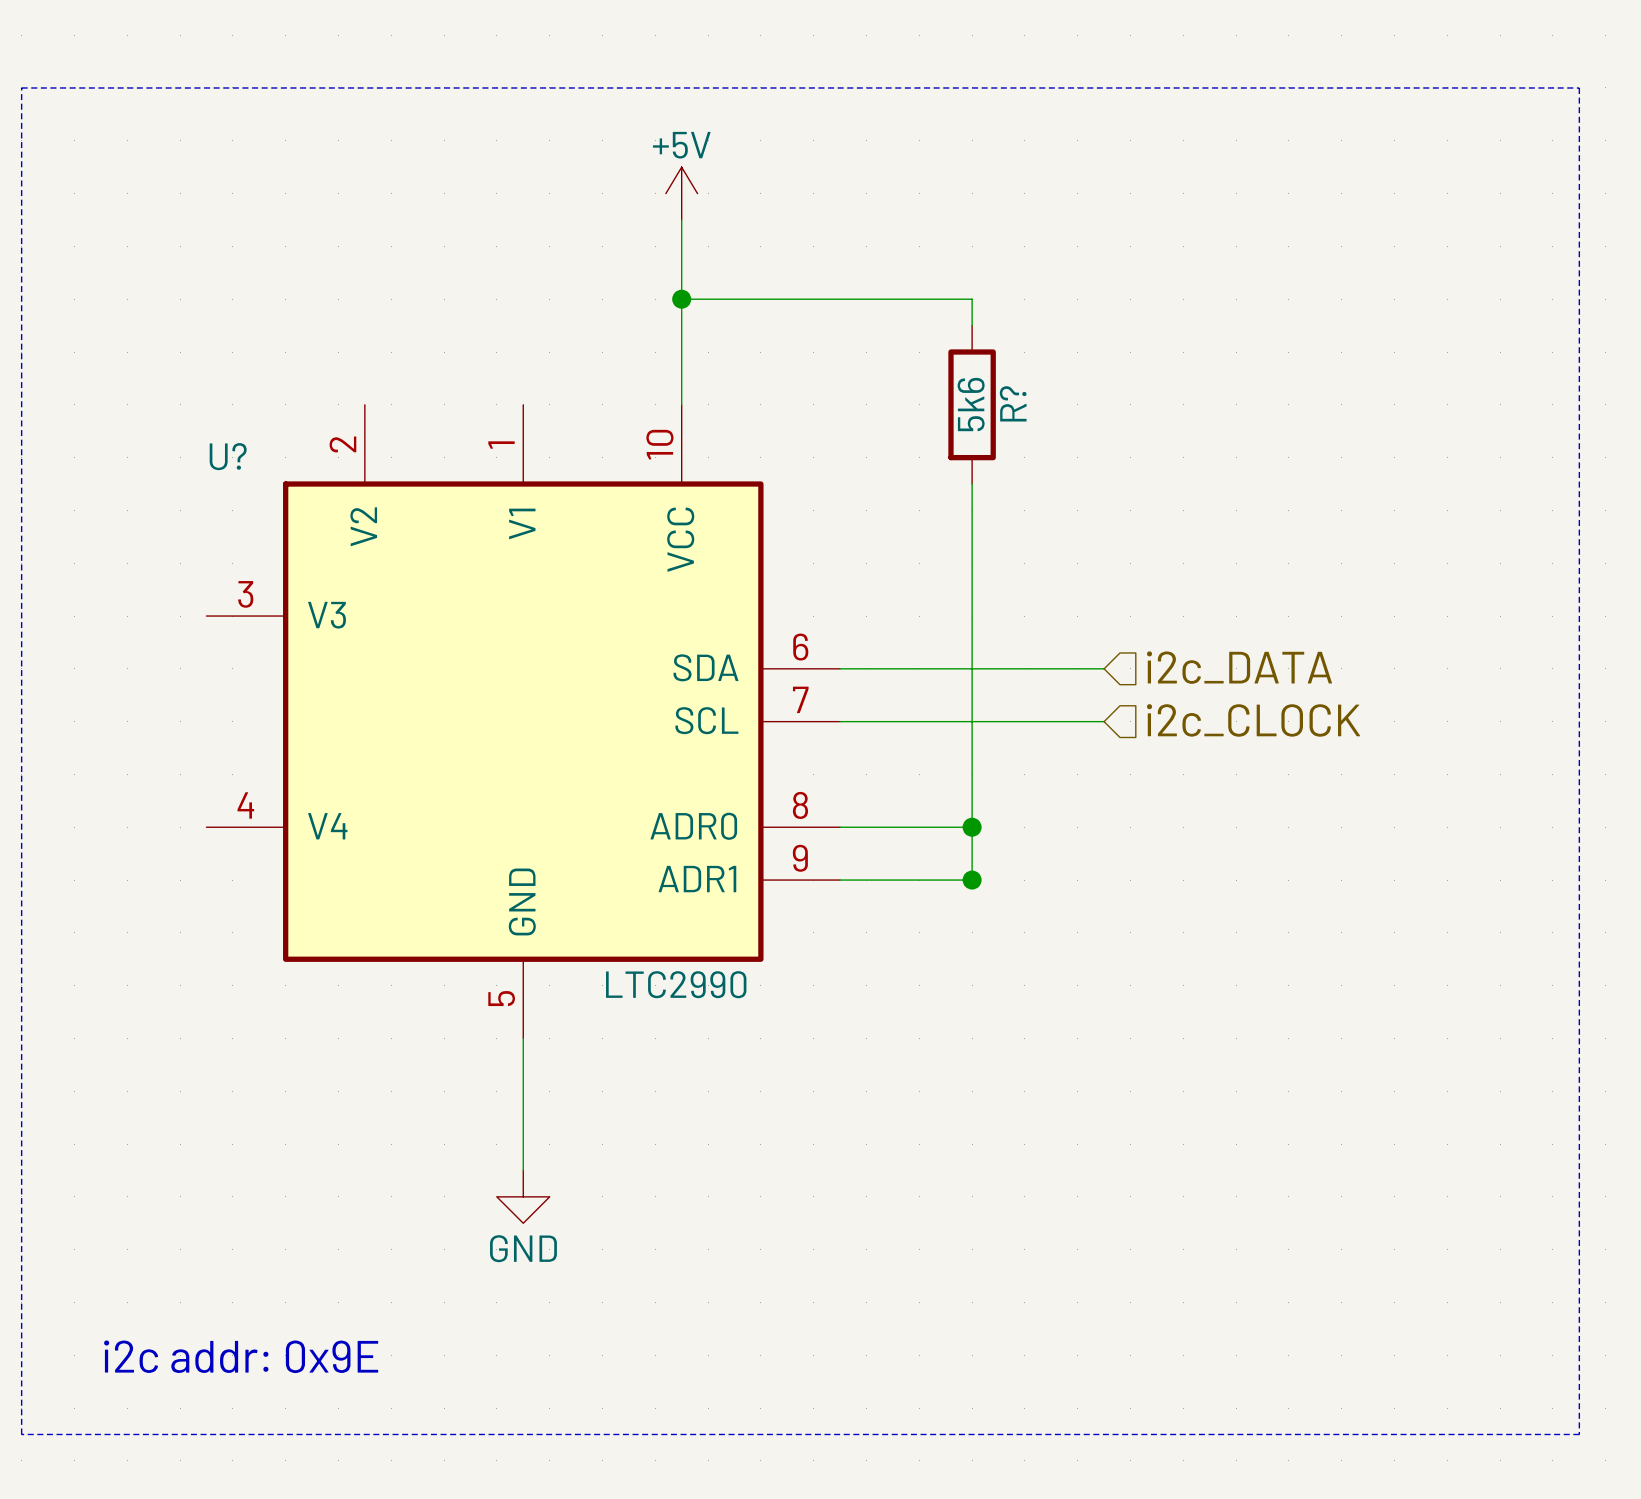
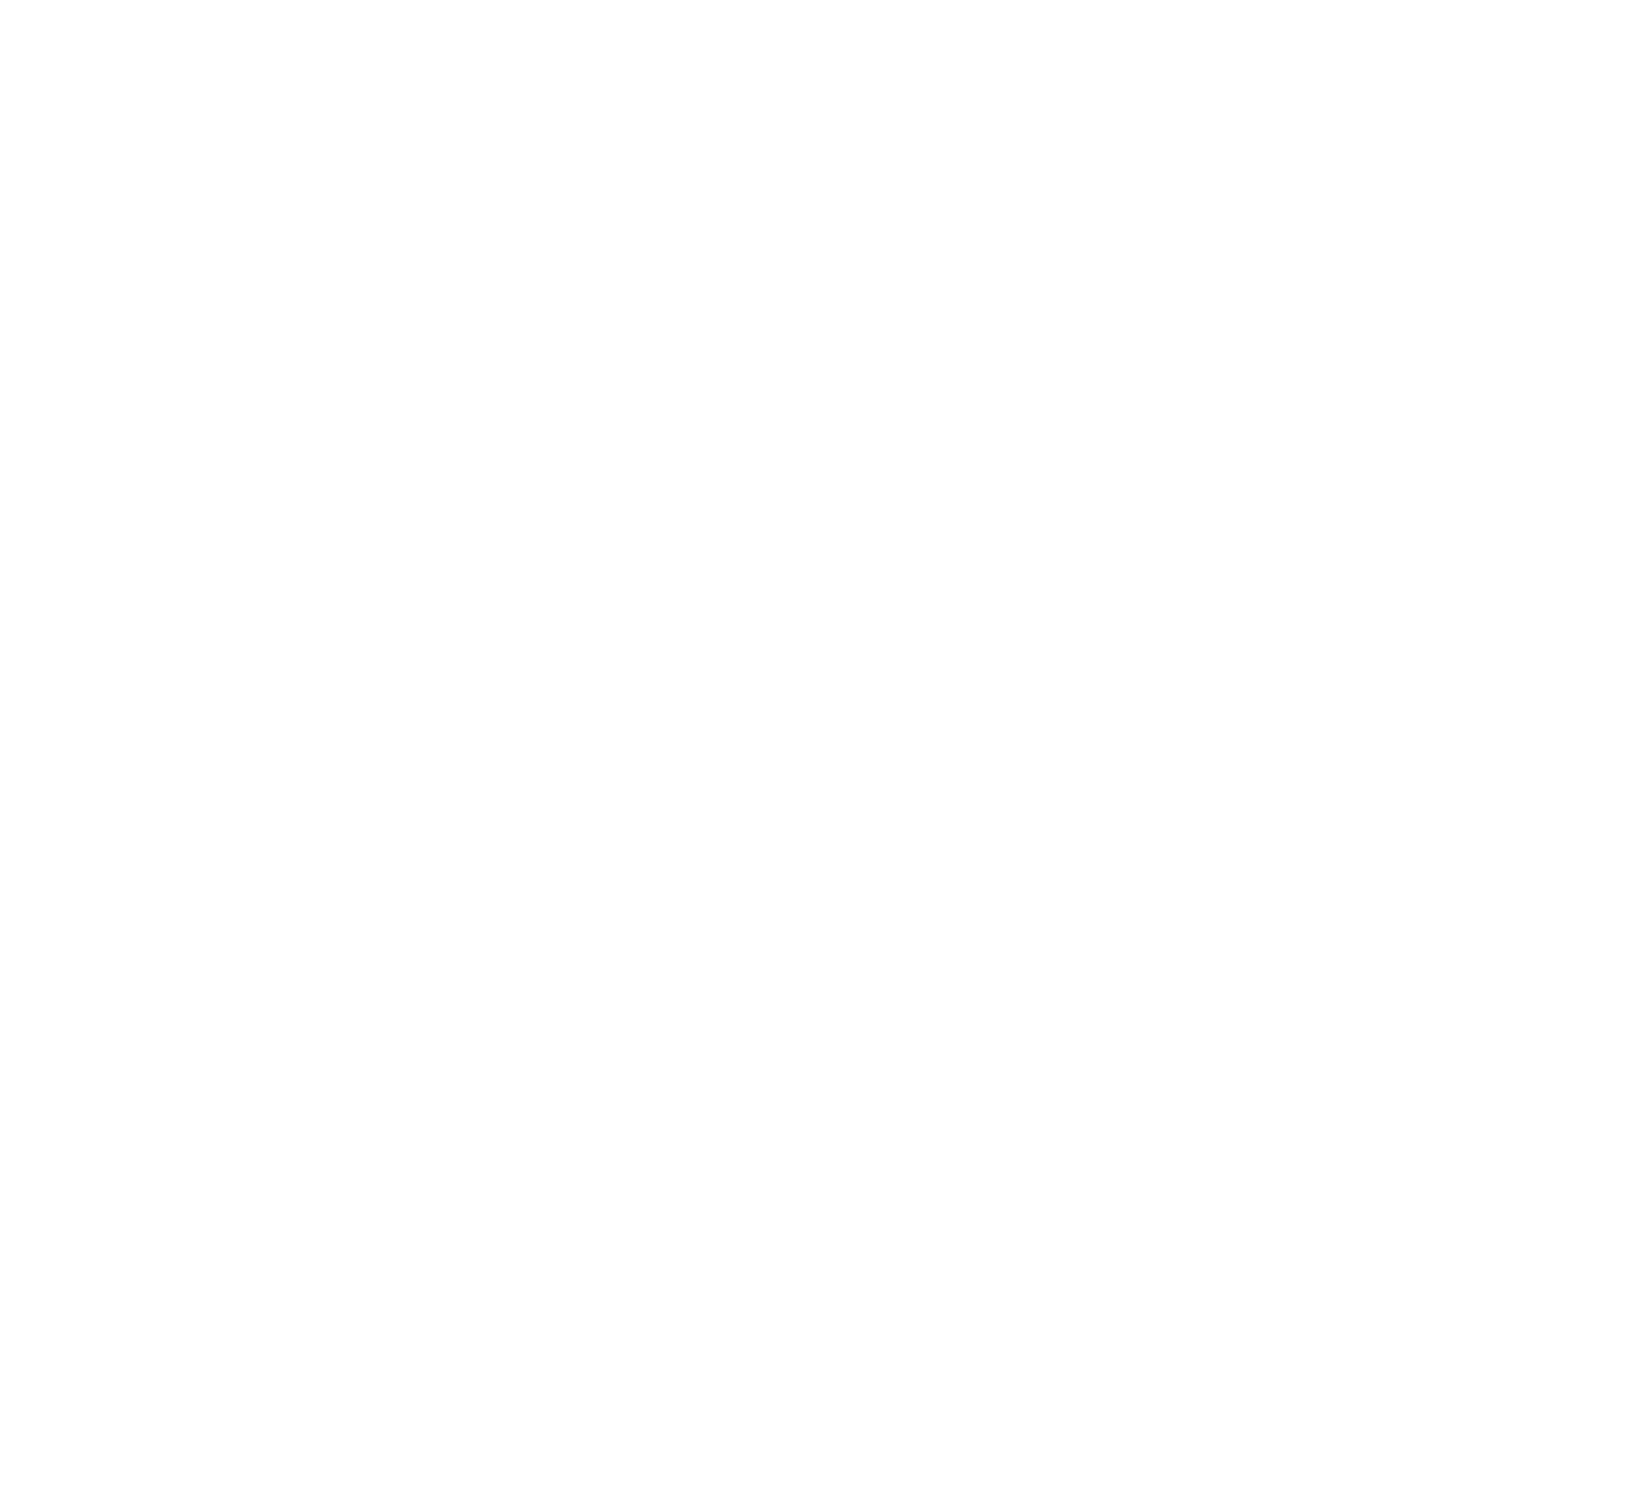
line: (21, 87) (1579, 87) (1579, 1434) (21, 1434) (21, 87) -> none
power symbol: +5V (681, 193) -> none
wire: (681, 220) (681, 404) -> none
wire: (681, 299) (972, 299) (972, 325) -> none
junction: (681, 299) -> none
R?: 5k6 (972, 404) -> none
wire: (972, 484) (972, 880) (840, 880) -> none
hierarchical label: i2c_DATA (1239, 667) -> none
wire: (840, 668) (1104, 668) -> none
hierarchical label: i2c_CLOCK (1253, 720) -> none
U?: LTC2990 (523, 721) -> none
wire: (840, 721) (1104, 721) -> none
wire: (840, 827) (972, 827) -> none
junction: (972, 827) -> none
junction: (972, 880) -> none
wire: (523, 1038) (523, 1170) -> none
power symbol: GND (523, 1196) -> none
text: i2c addr: 0x9E (241, 1356) -> none

